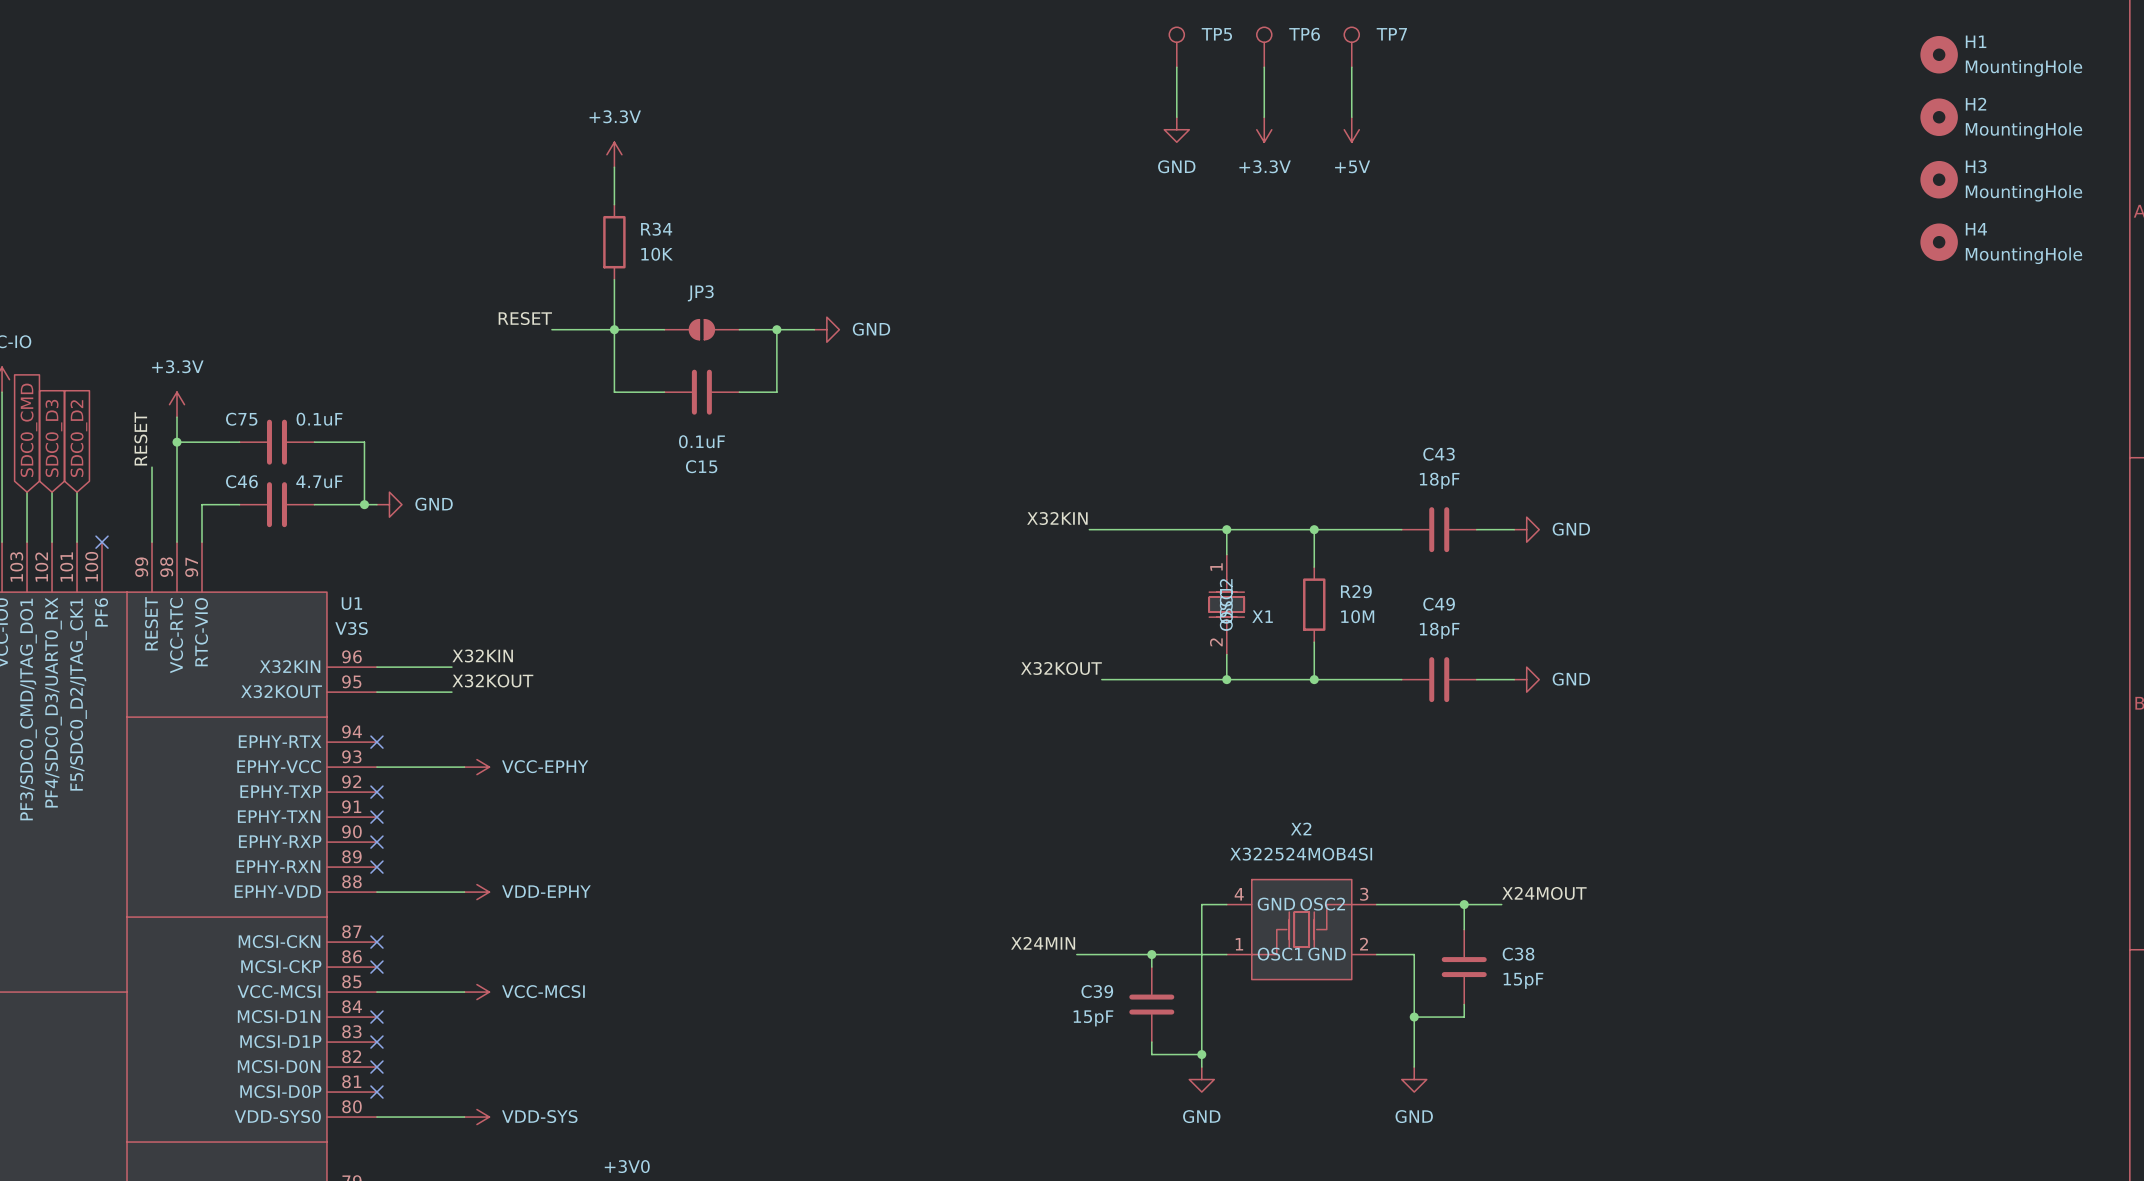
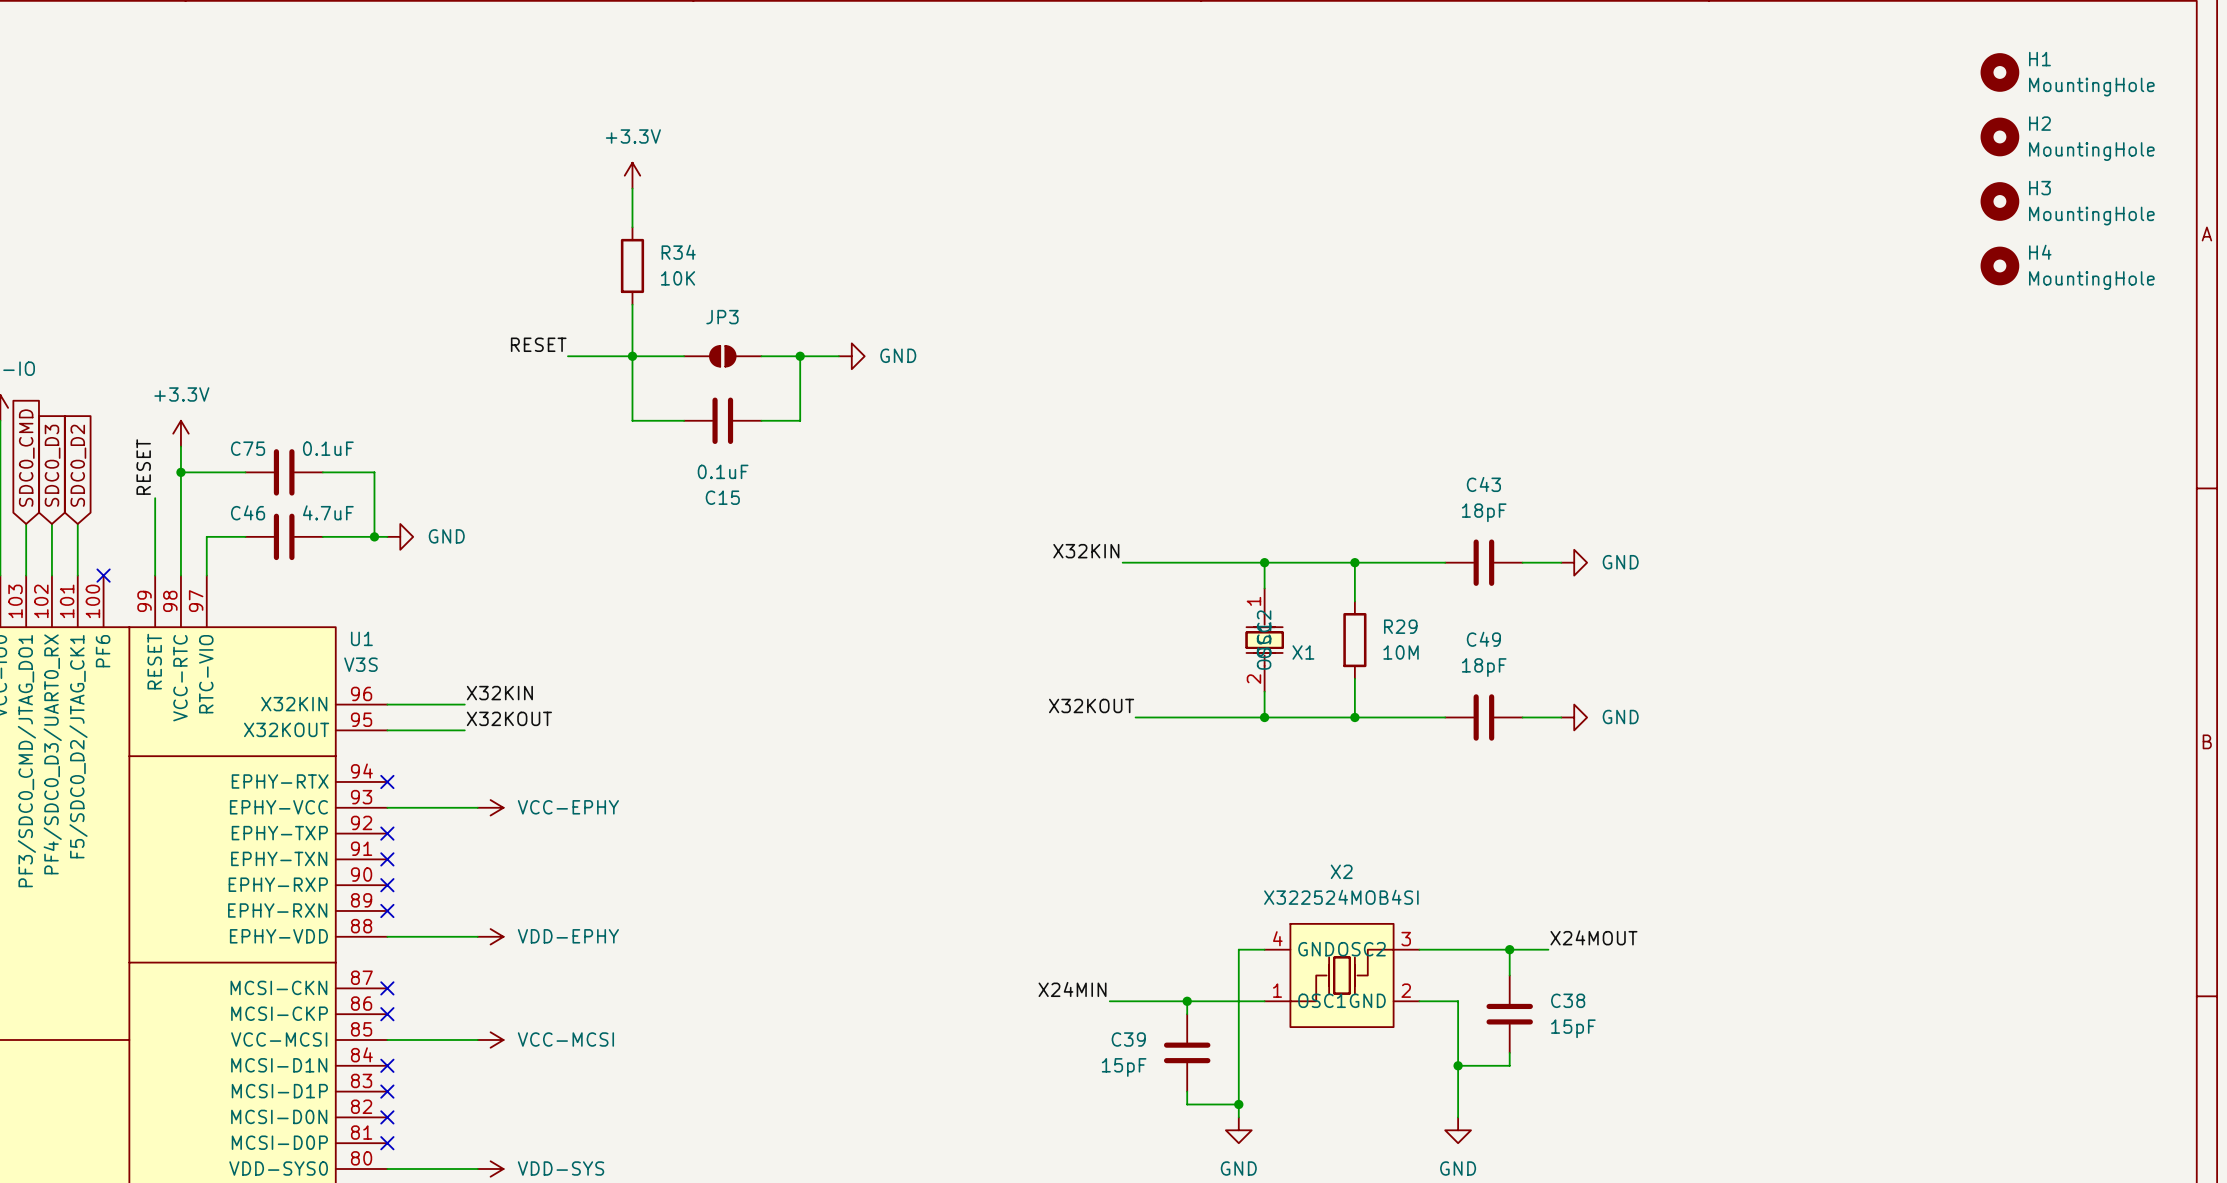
TP5: (1176, 47) -> none
TP6: (1264, 47) -> none
TP7: (1351, 47) -> none
wire: (1176, 67) (1176, 117) -> none
wire: (1264, 67) (1264, 117) -> none
wire: (1351, 67) (1351, 117) -> none
power symbol: GND (1176, 129) -> none
power symbol: +3.3V (1264, 129) -> none
power symbol: +5V (1351, 129) -> none

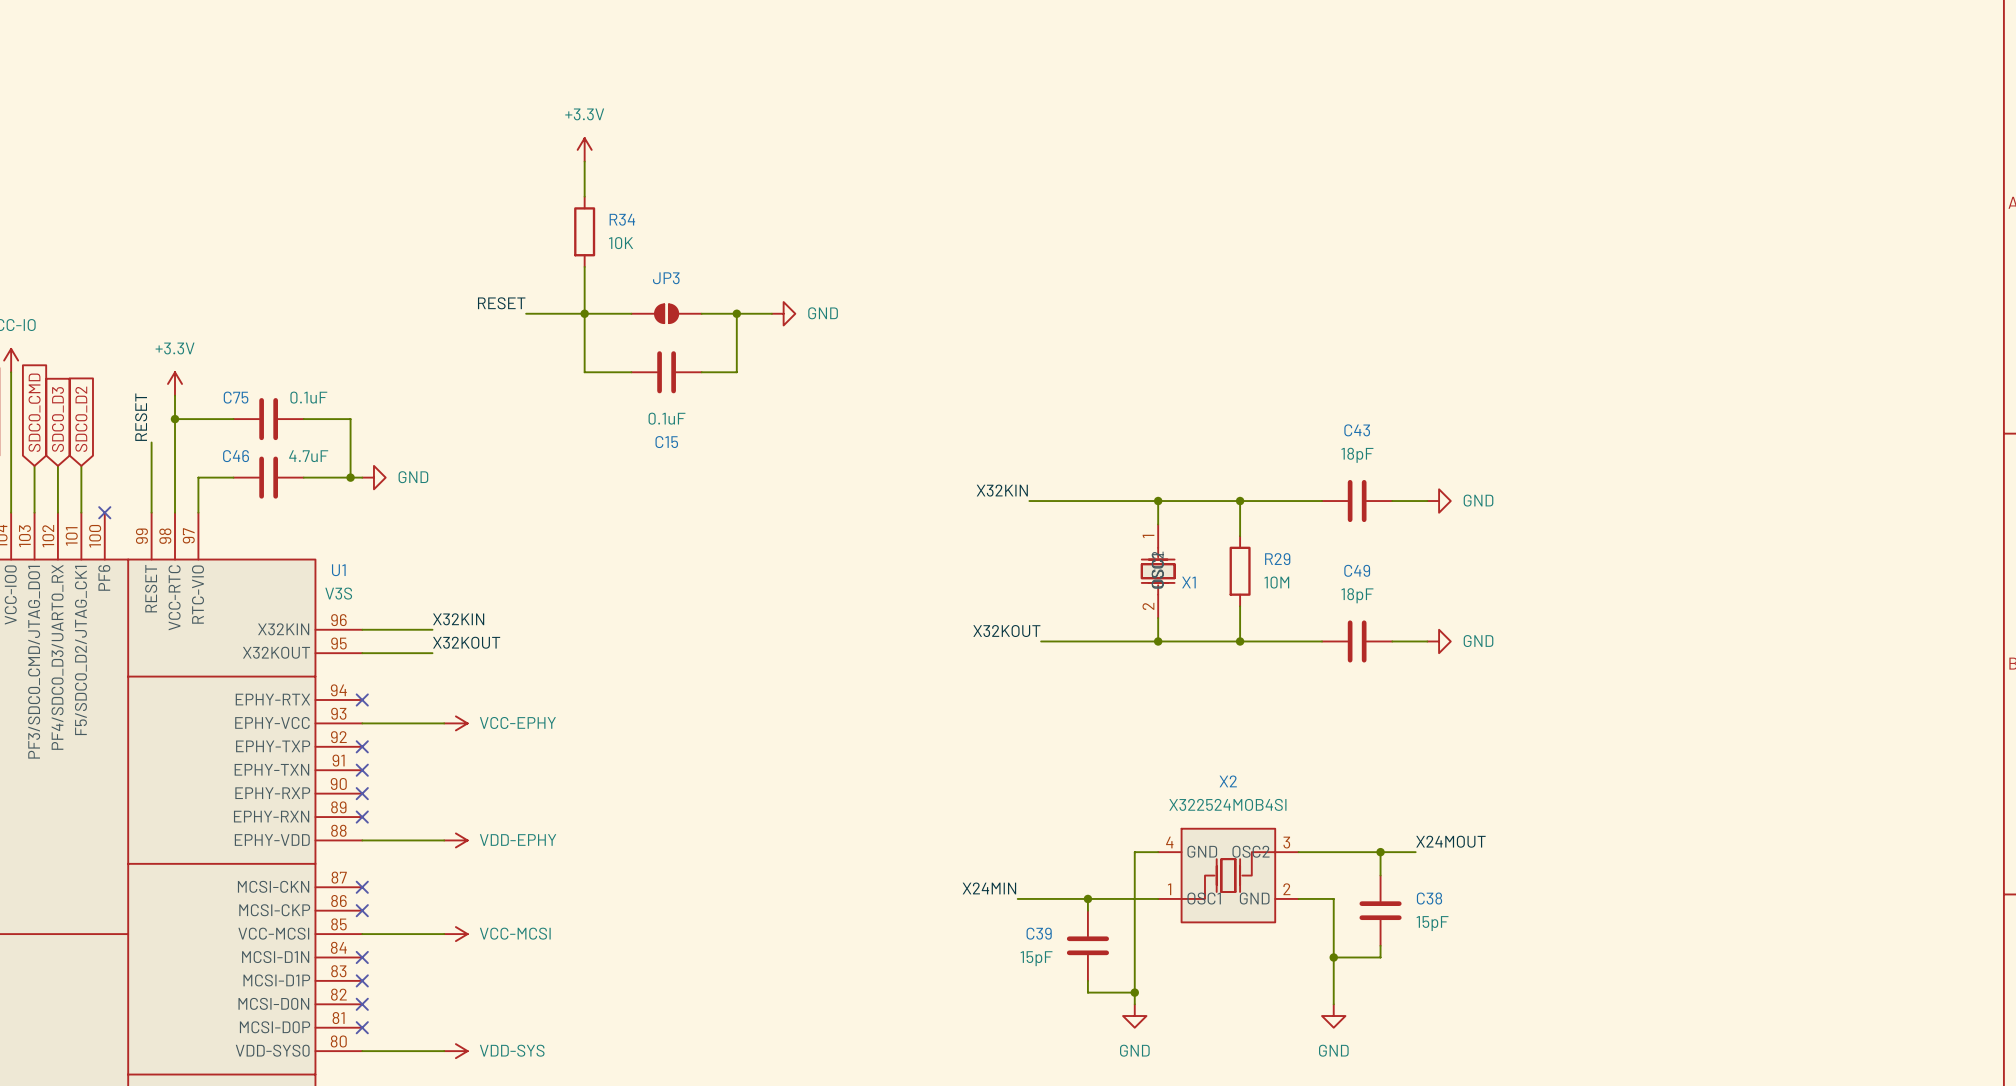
H1: MountingHole (1999, 72) -> none
H2: MountingHole (1999, 136) -> none
H3: MountingHole (1999, 201) -> none
H4: MountingHole (1999, 265) -> none

